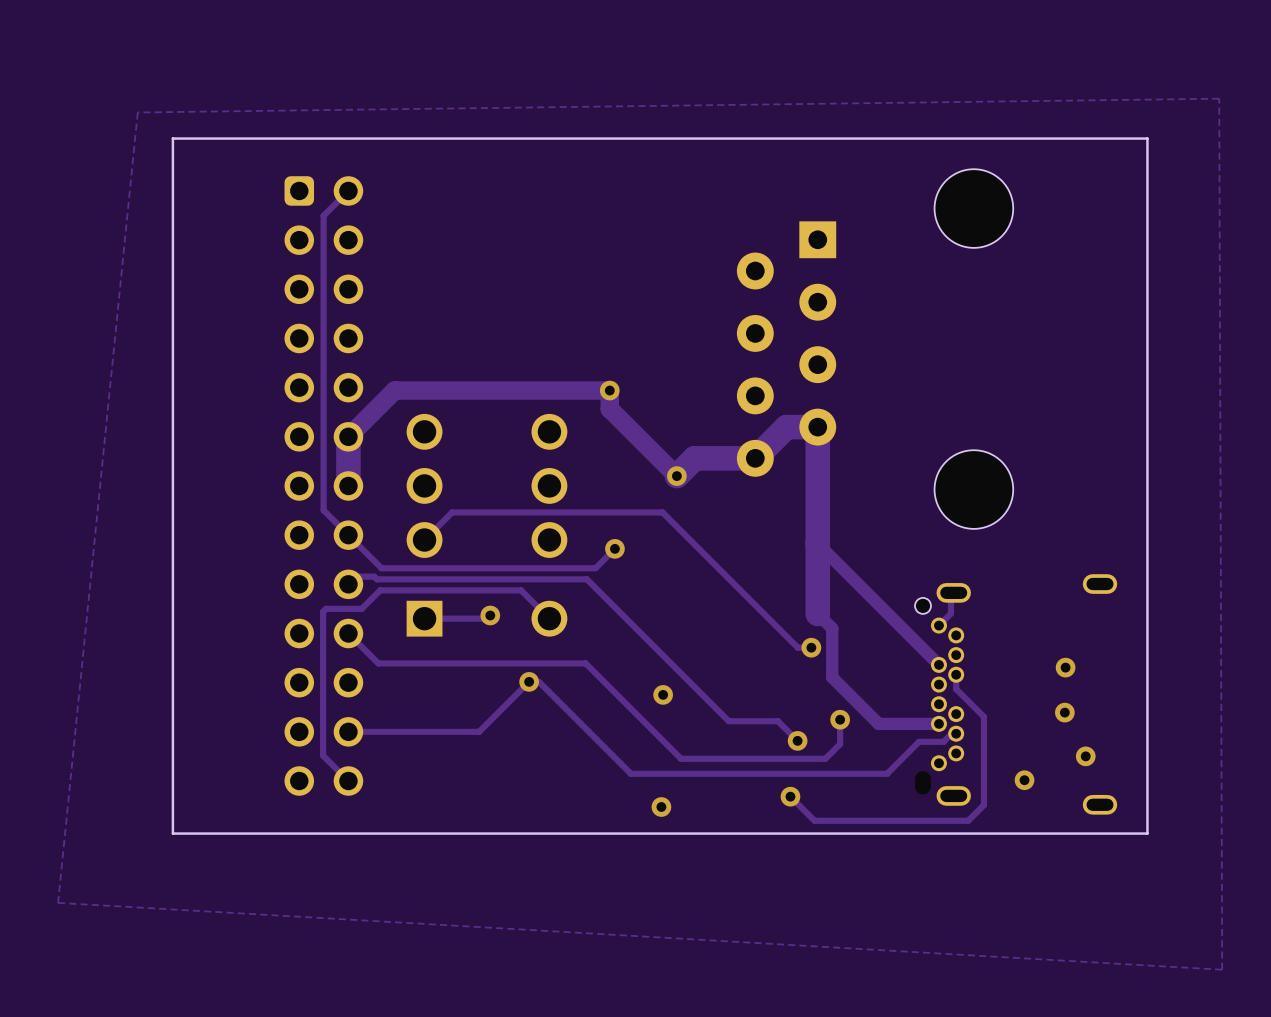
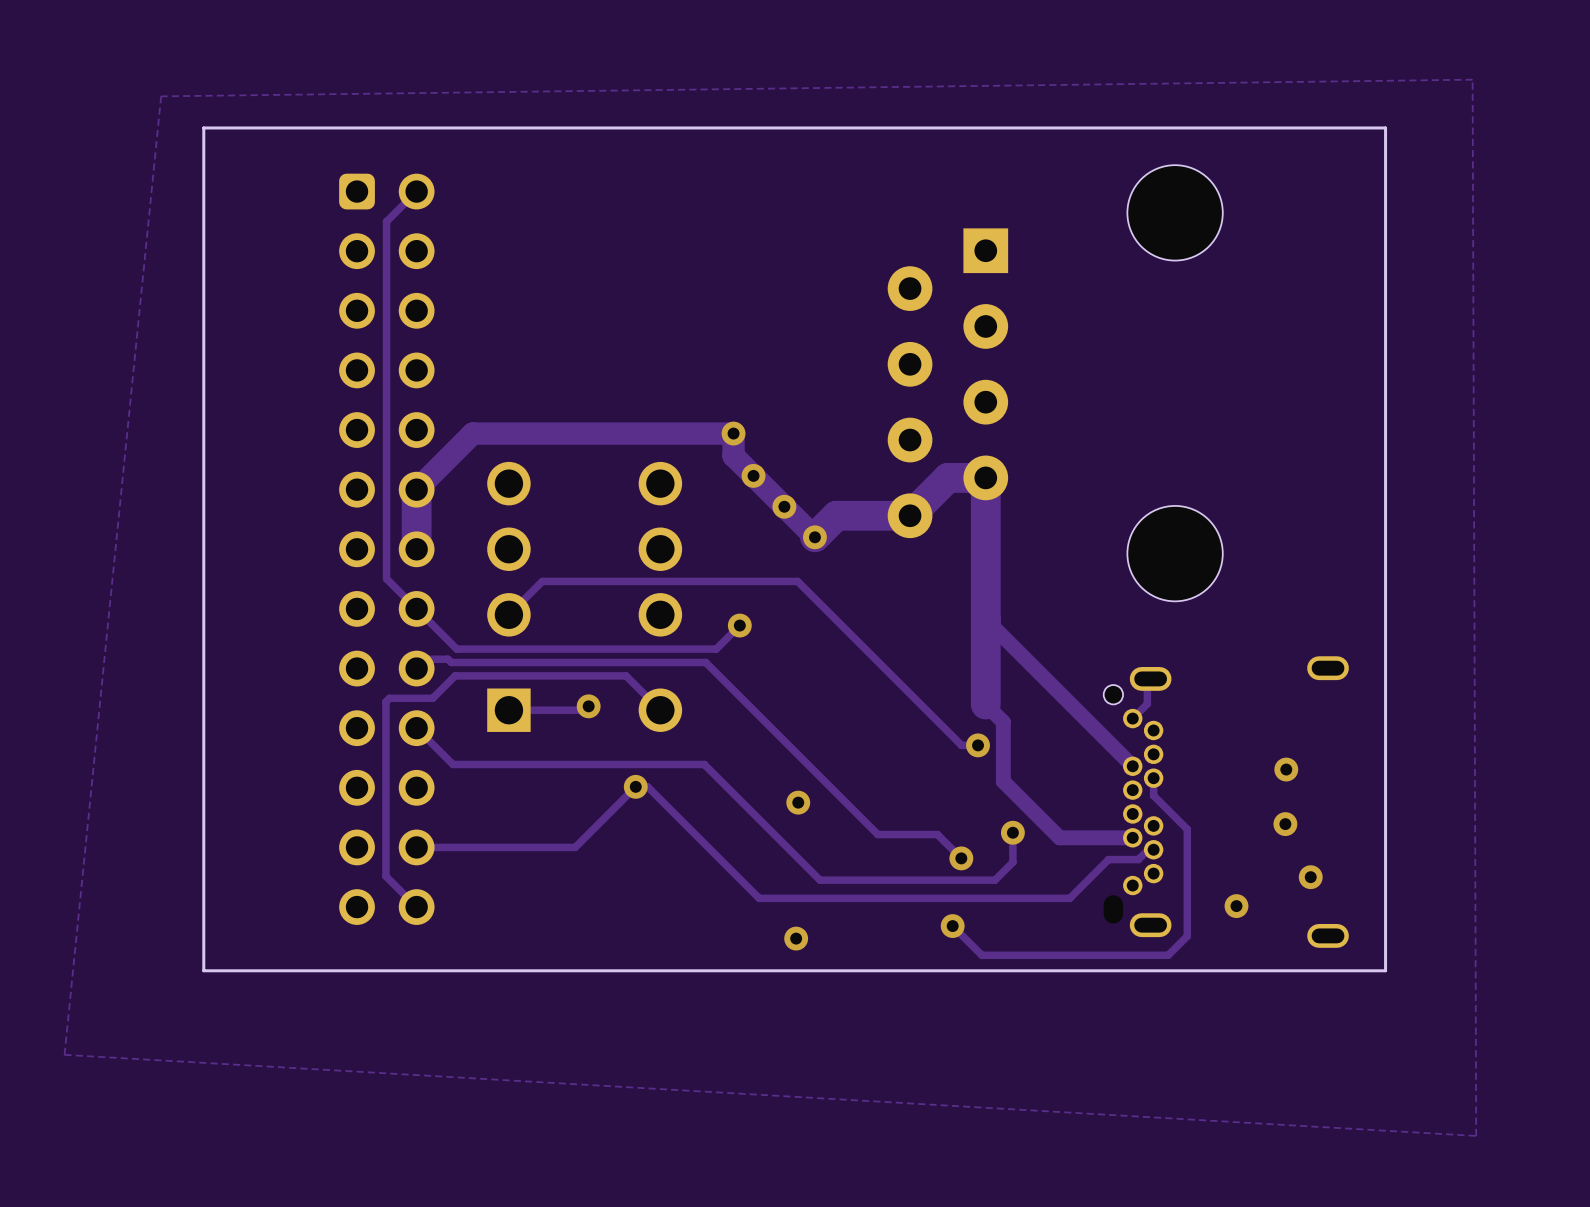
via: none -> (753, 475)
via: none -> (784, 506)

